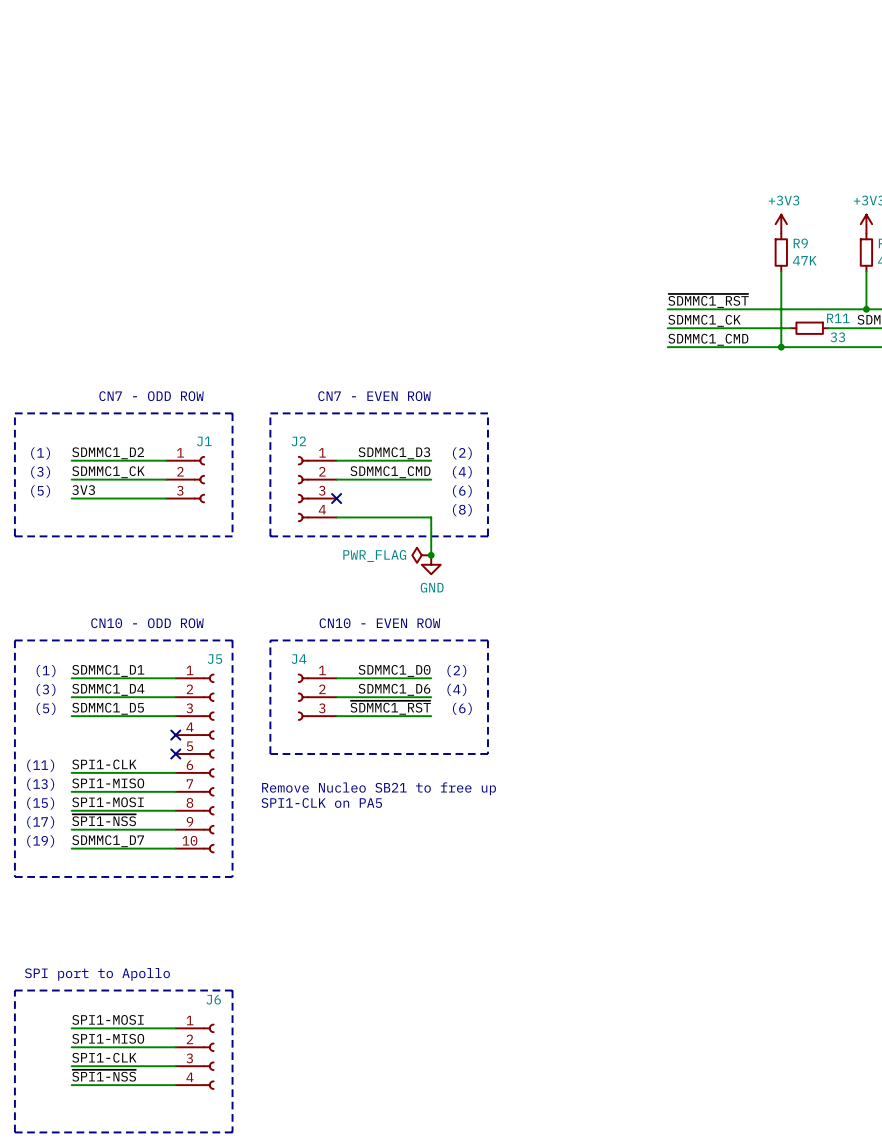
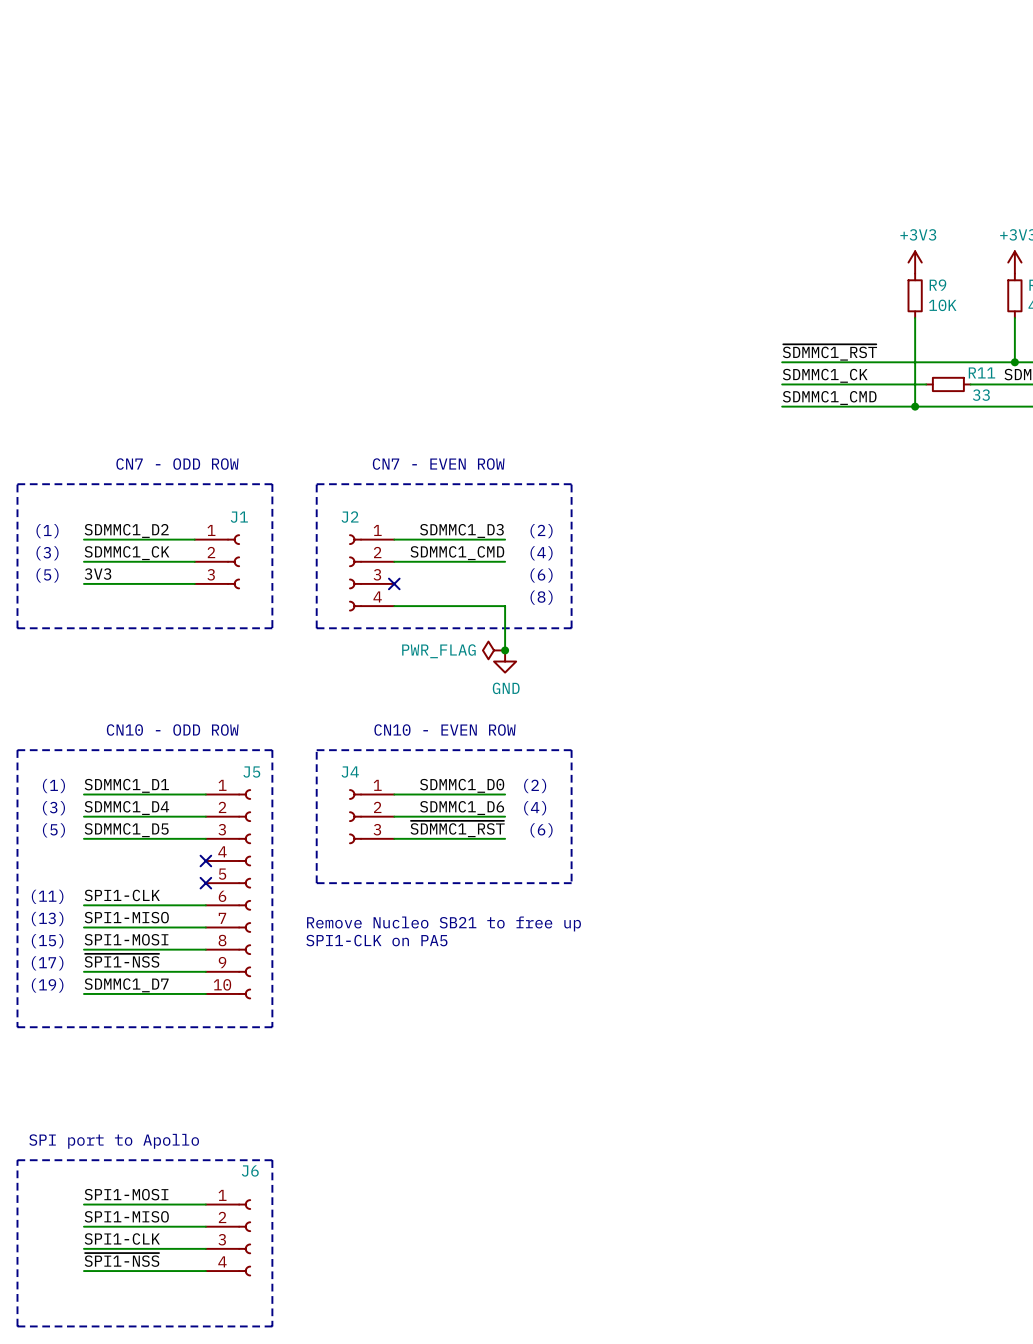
R9 value: 47K (804, 260) -> 10K (942, 305)

